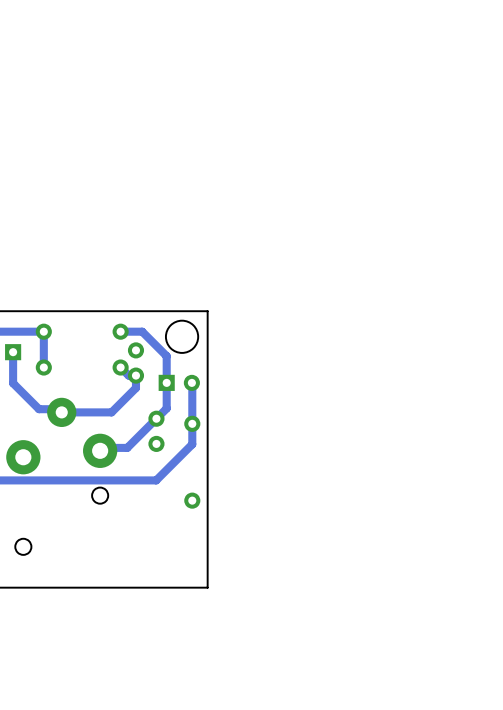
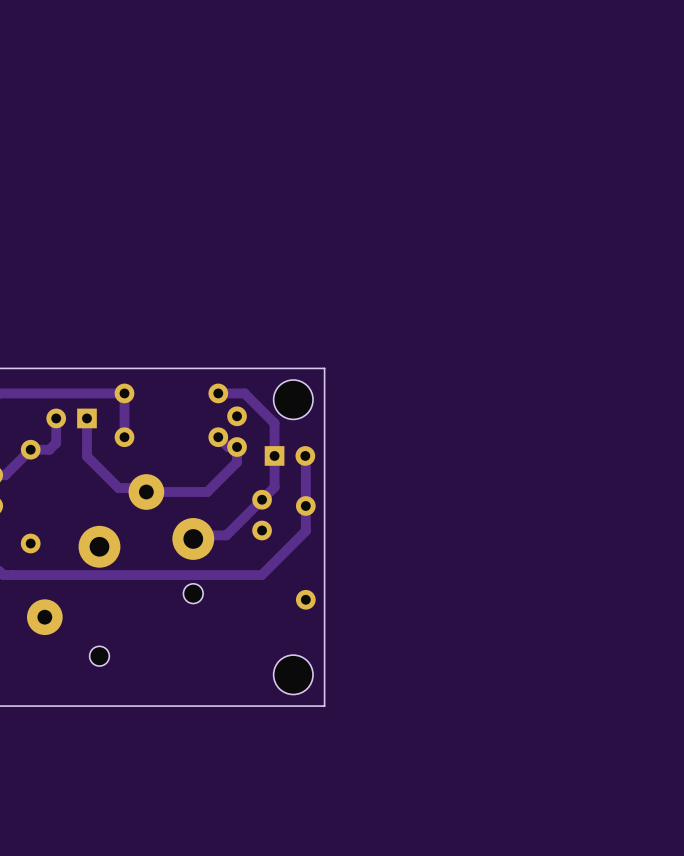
part: none -> (293, 674)

